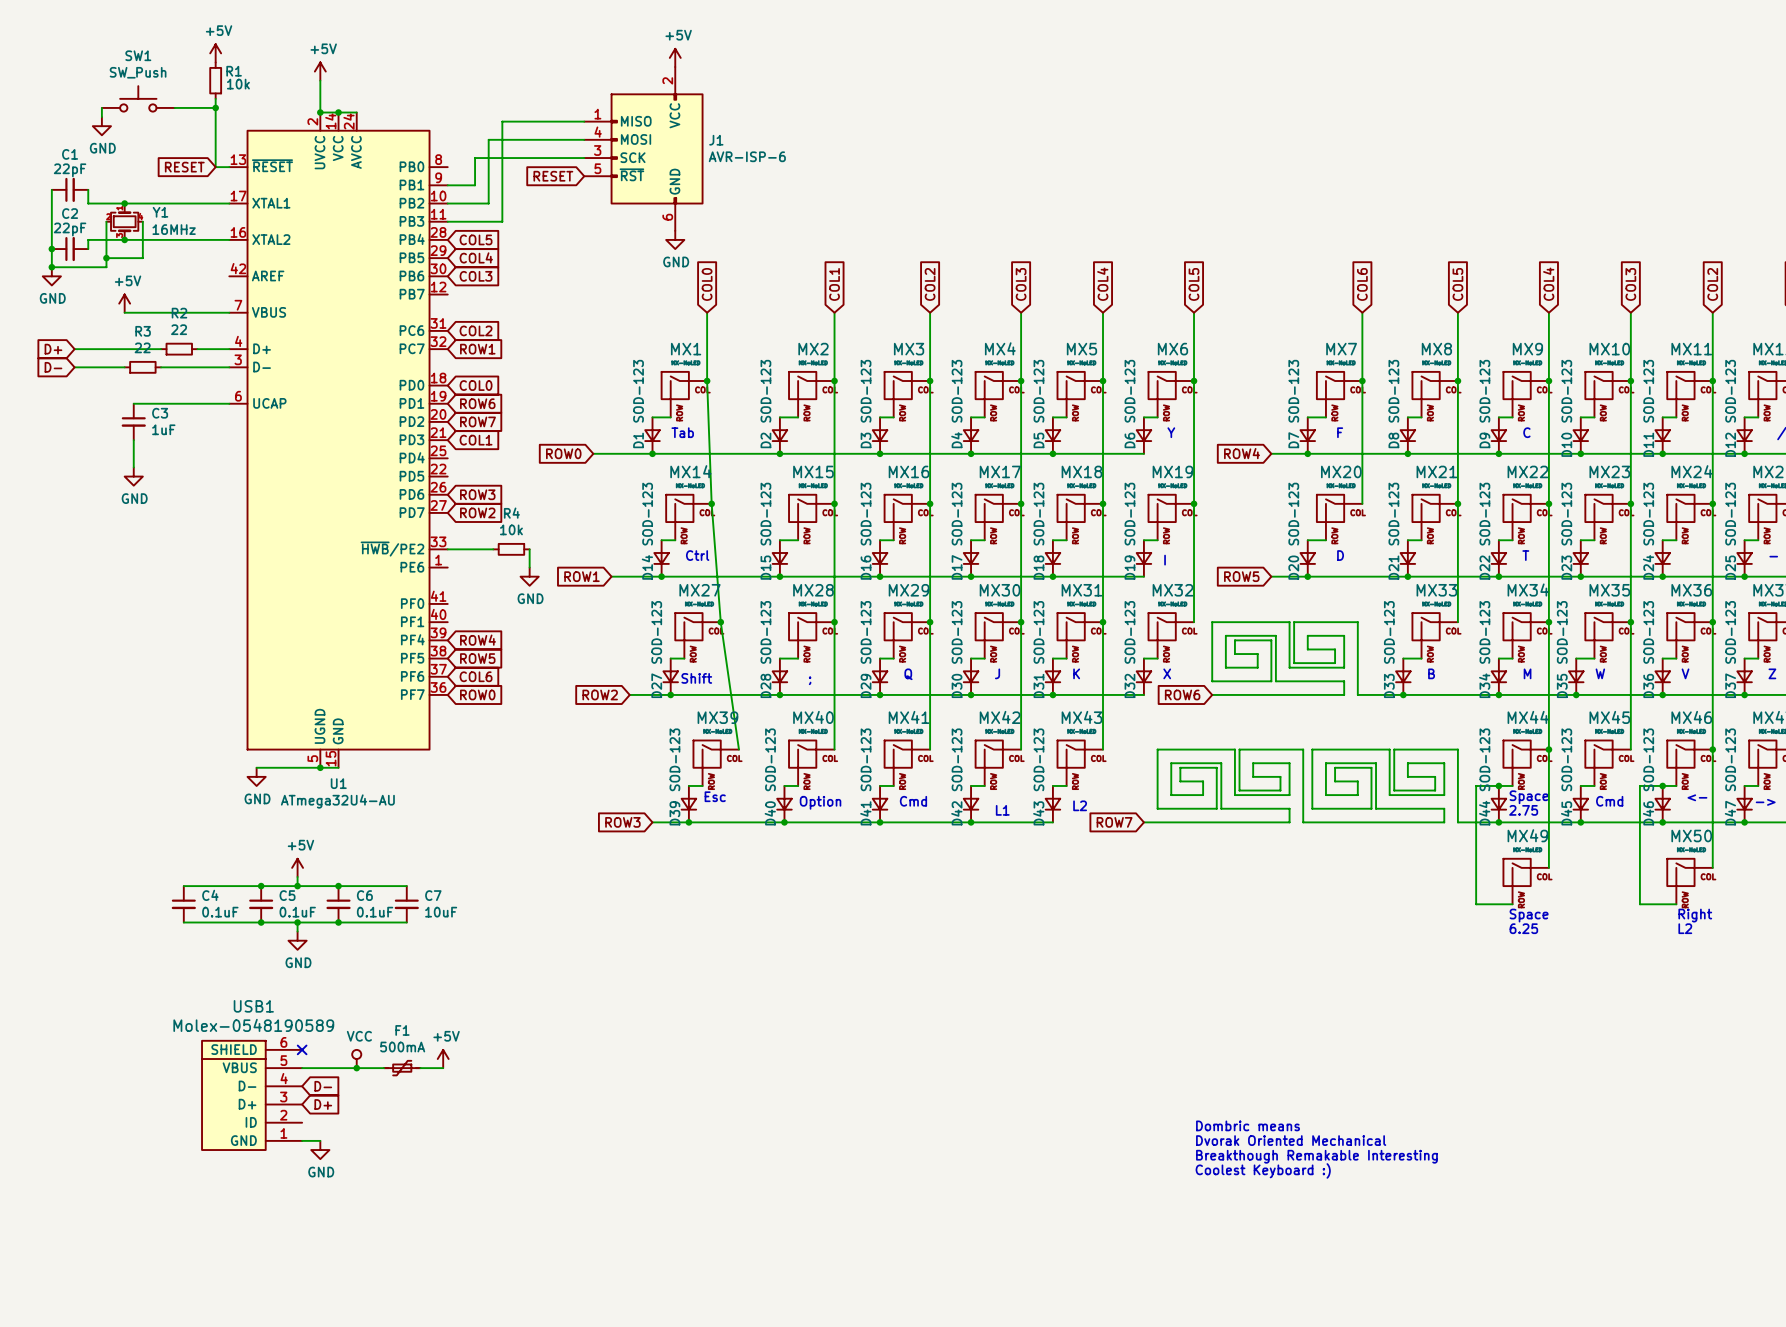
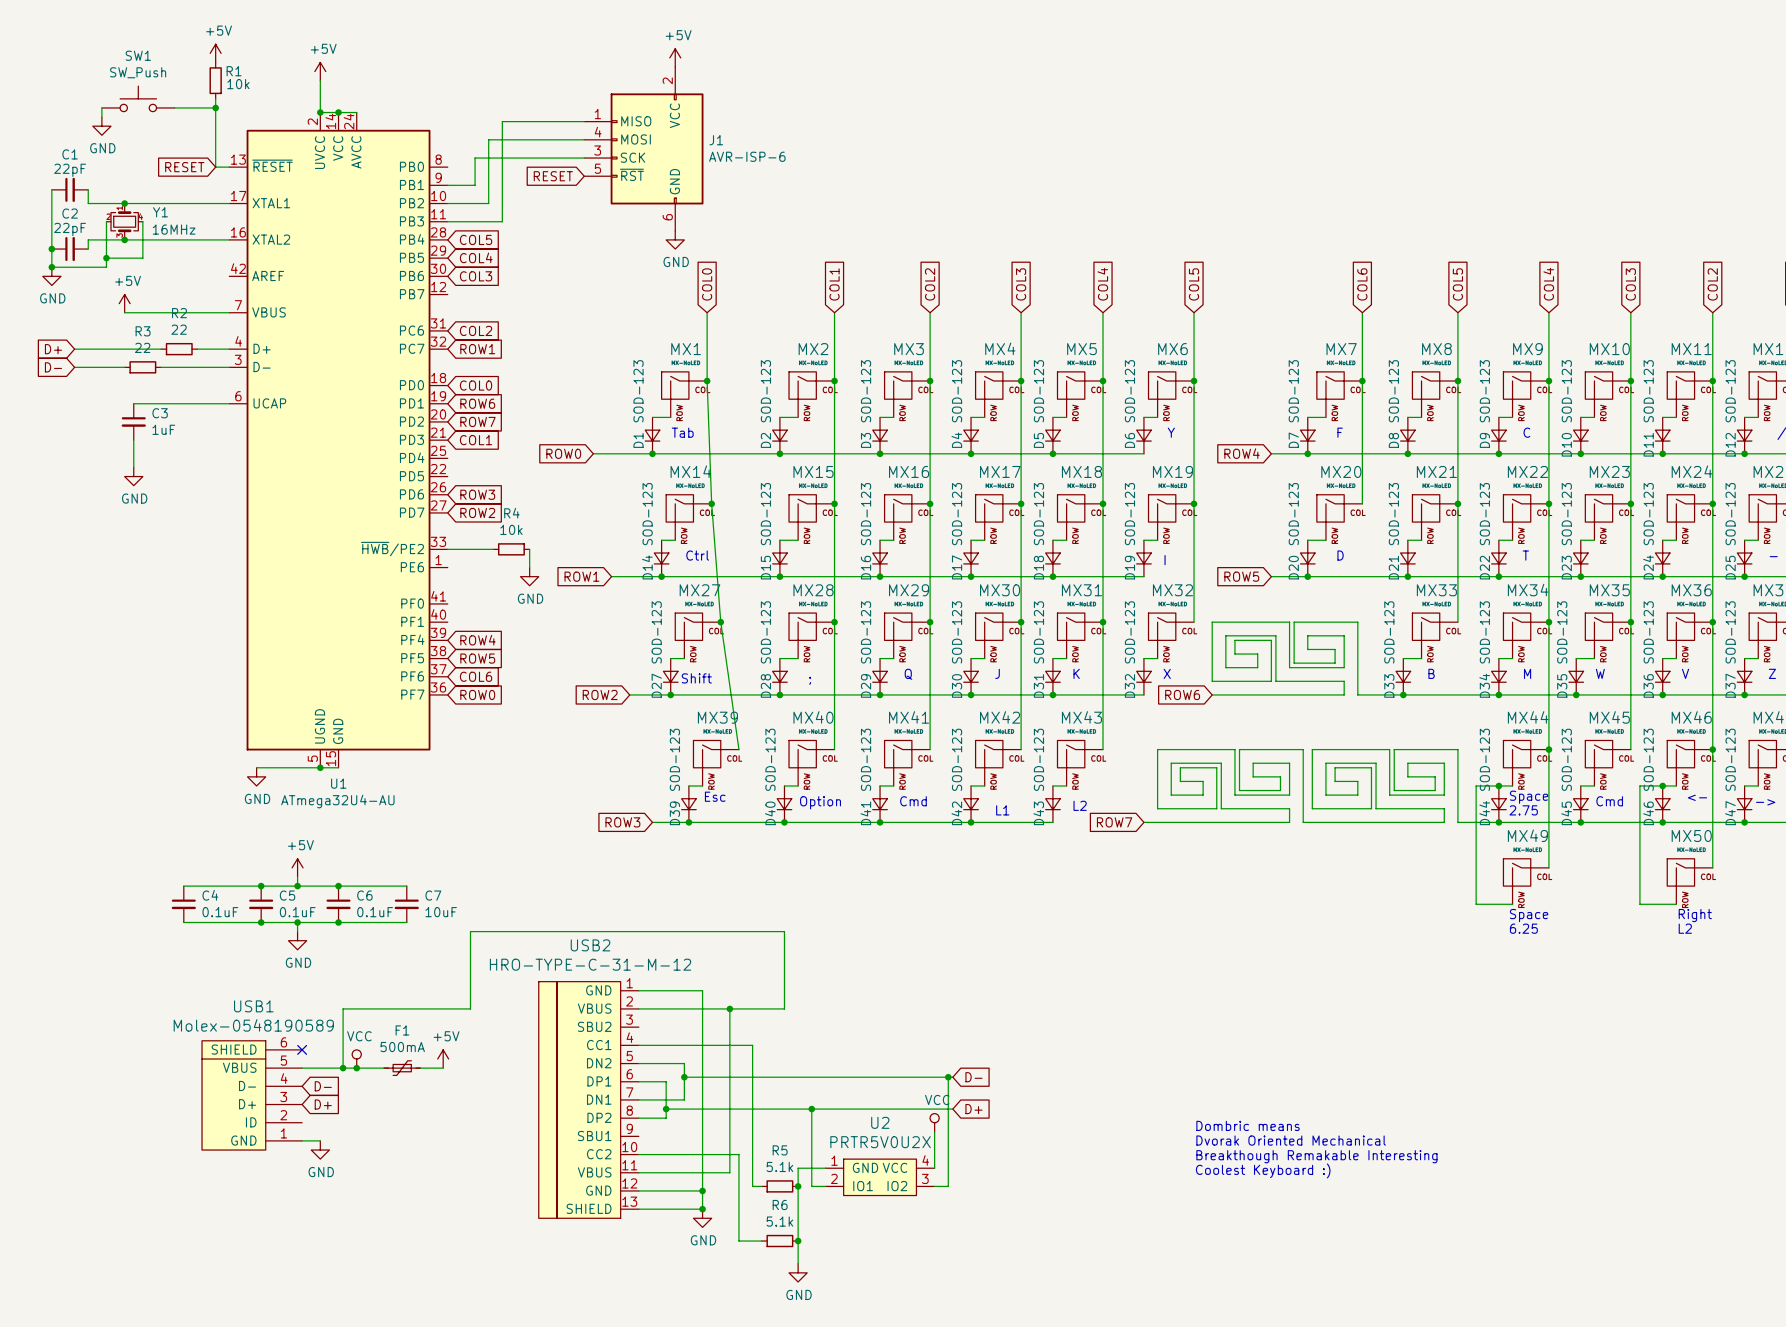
wire: none -> (638, 990) (702, 990) (702, 1209) (638, 1209)
wire: none -> (638, 1008) (784, 1008) (784, 931) (470, 931) (470, 1008) (343, 1008) (343, 1068)
wire: none -> (729, 1008) (729, 1172) (638, 1172)
junction: none -> (729, 1008)
wire: none -> (638, 1045) (752, 1045) (752, 1186) (761, 1186)
wire: none -> (638, 1063) (684, 1063) (684, 1099) (638, 1099)
junction: none -> (343, 1068)
wire: none -> (684, 1077) (952, 1077)
junction: none -> (684, 1077)
wire: none -> (948, 1077) (948, 1186) (934, 1186)
junction: none -> (948, 1077)
global label: none -> D- (973, 1077)
wire: none -> (638, 1081) (666, 1081) (666, 1118) (638, 1118)
USB2: none -> HRO-TYPE-C-31-M-12 (588, 1099)
wire: none -> (666, 1109) (952, 1109)
junction: none -> (666, 1109)
wire: none -> (811, 1109) (811, 1186) (825, 1186)
junction: none -> (811, 1109)
global label: none -> D+ (973, 1109)
power symbol: none -> VCC (934, 1122)
wire: none -> (934, 1131) (934, 1168)
wire: none -> (638, 1154) (738, 1154) (738, 1241) (761, 1241)
wire: none -> (825, 1168) (798, 1168) (798, 1263)
U2: none -> PRTR5V0U2X (880, 1177)
R5: none -> 5.1k (779, 1186)
junction: none -> (798, 1186)
wire: none -> (638, 1190) (702, 1190)
junction: none -> (702, 1190)
junction: none -> (702, 1209)
power symbol: none -> GND (702, 1218)
R6: none -> 5.1k (779, 1241)
junction: none -> (798, 1241)
power symbol: none -> GND (798, 1272)

